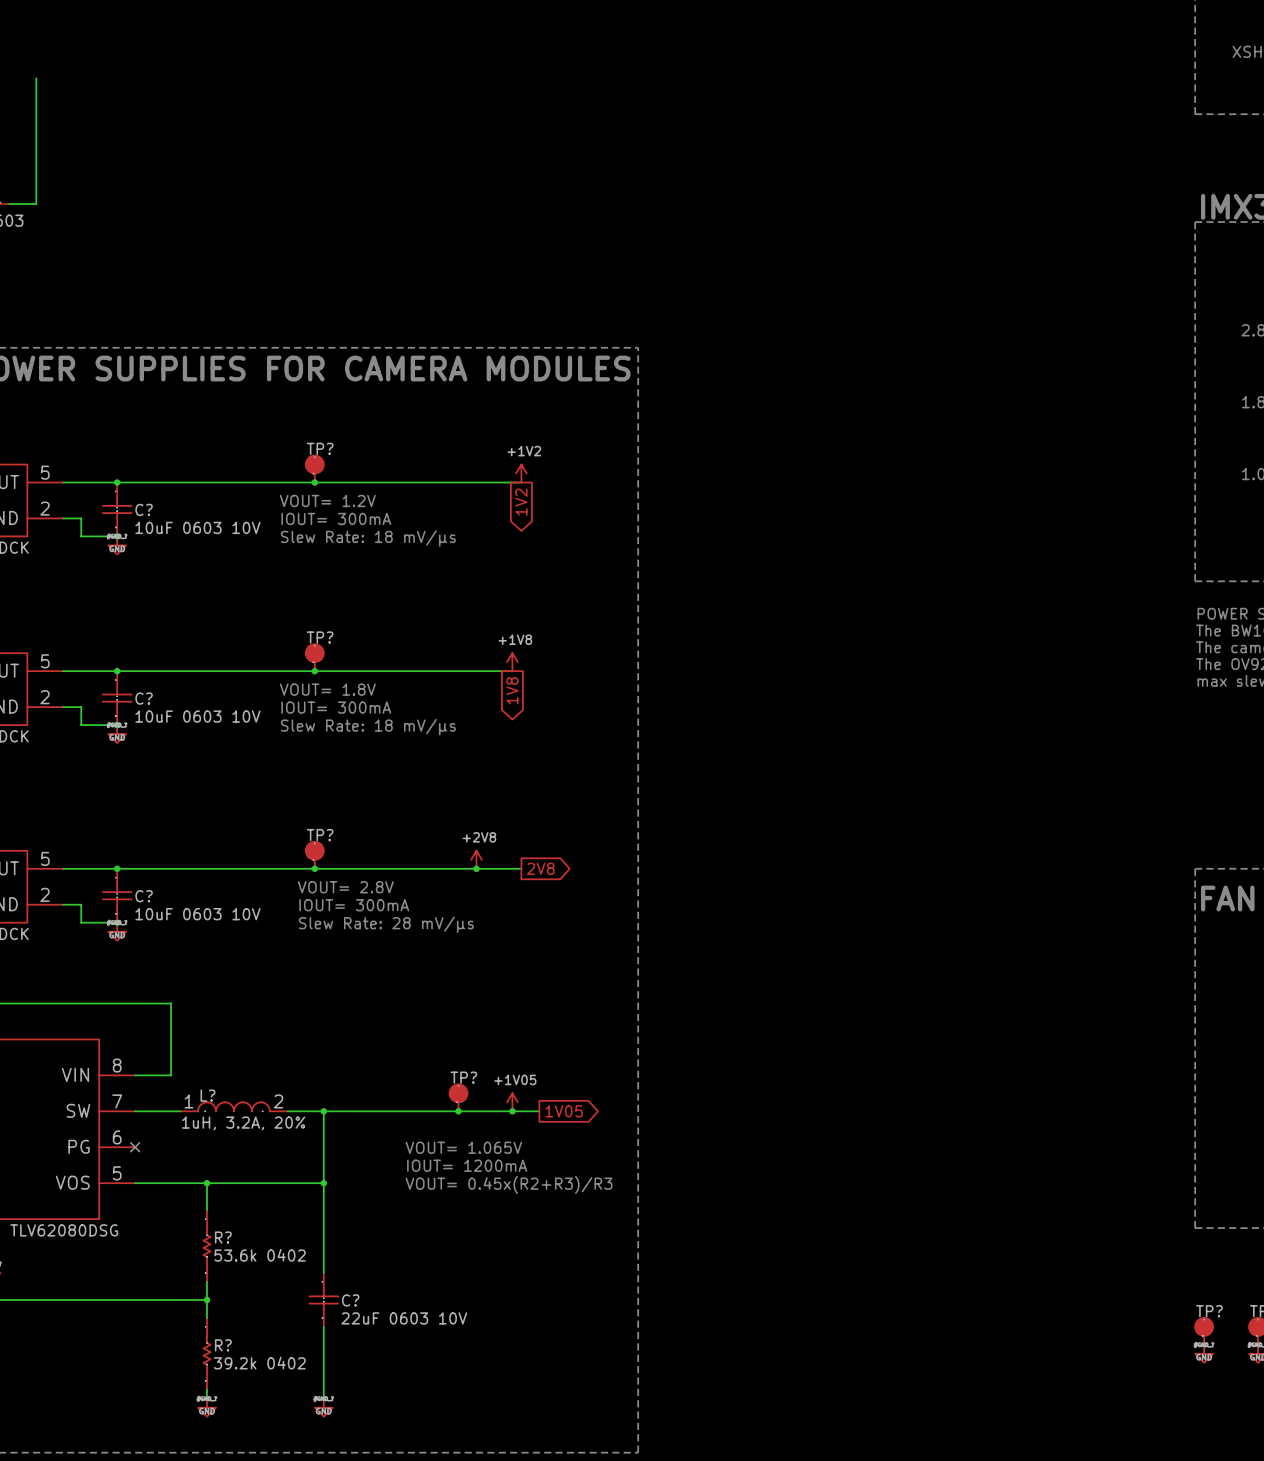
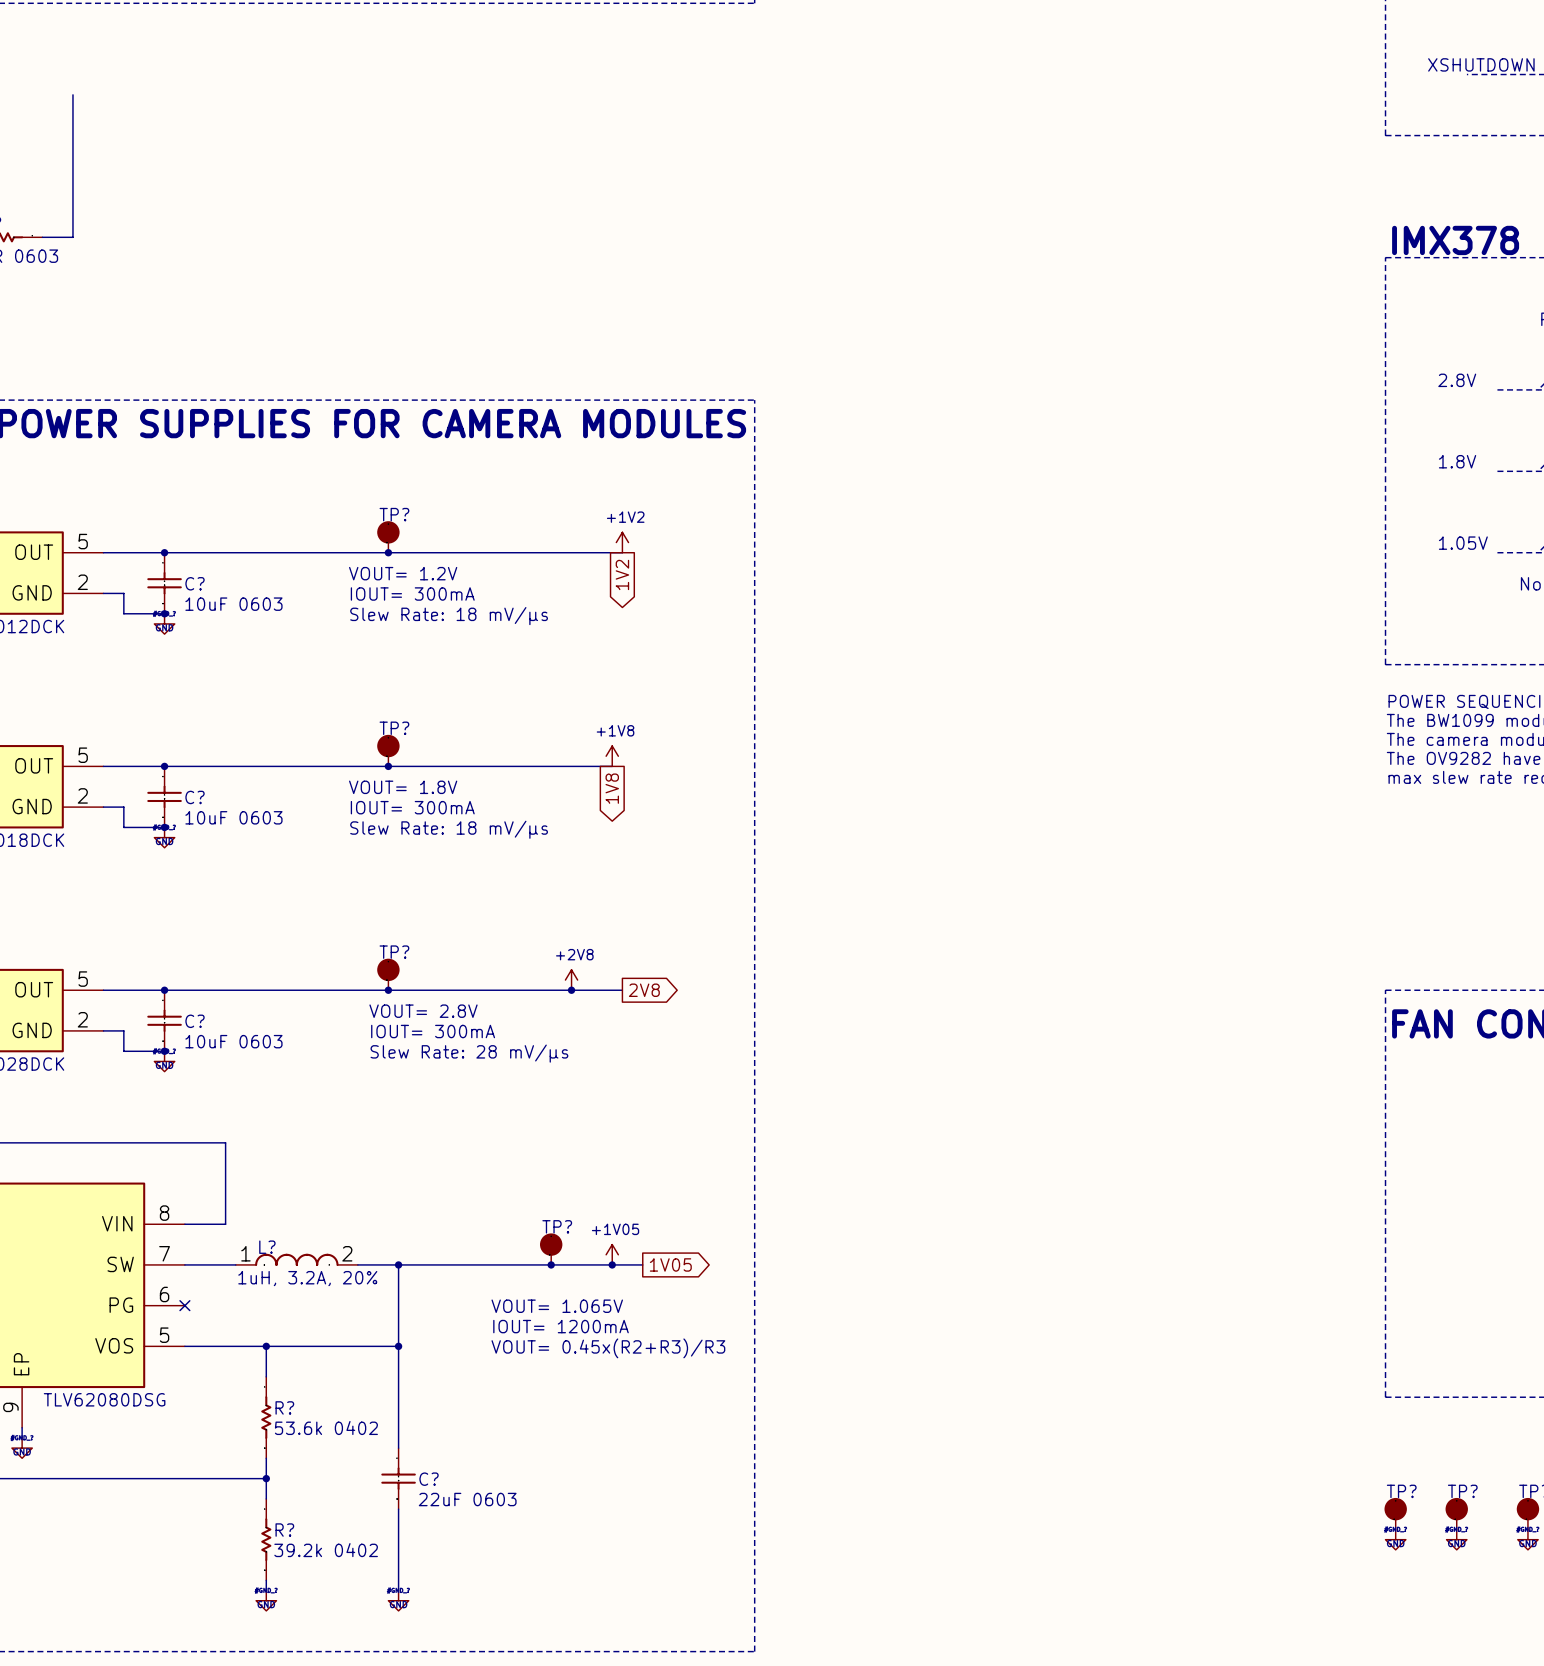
C? value: 10uF 0603 10V (197, 527) -> 10uF 0603 (233, 604)
C? value: 10uF 0603 10V (197, 716) -> 10uF 0603 (233, 817)
C? value: 10uF 0603 10V (197, 914) -> 10uF 0603 (233, 1041)
C? value: 22uF 0603 10V (404, 1318) -> 22uF 0603 (467, 1499)

